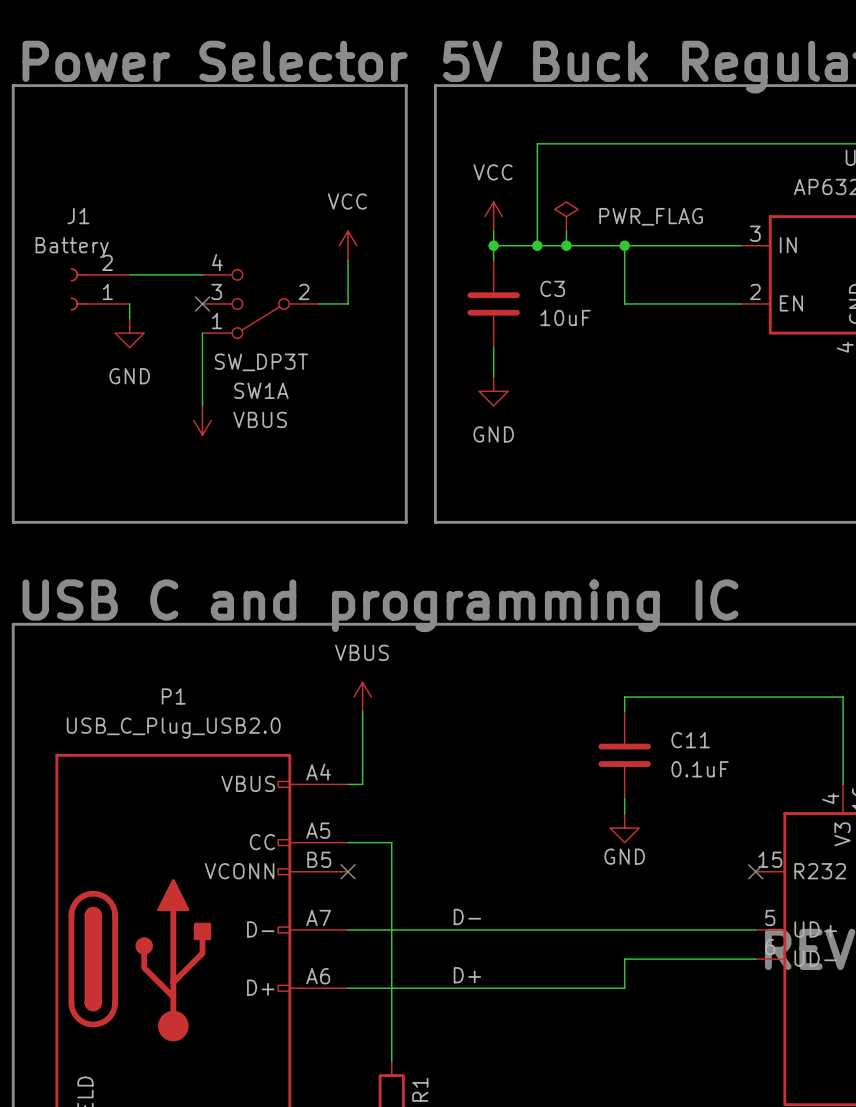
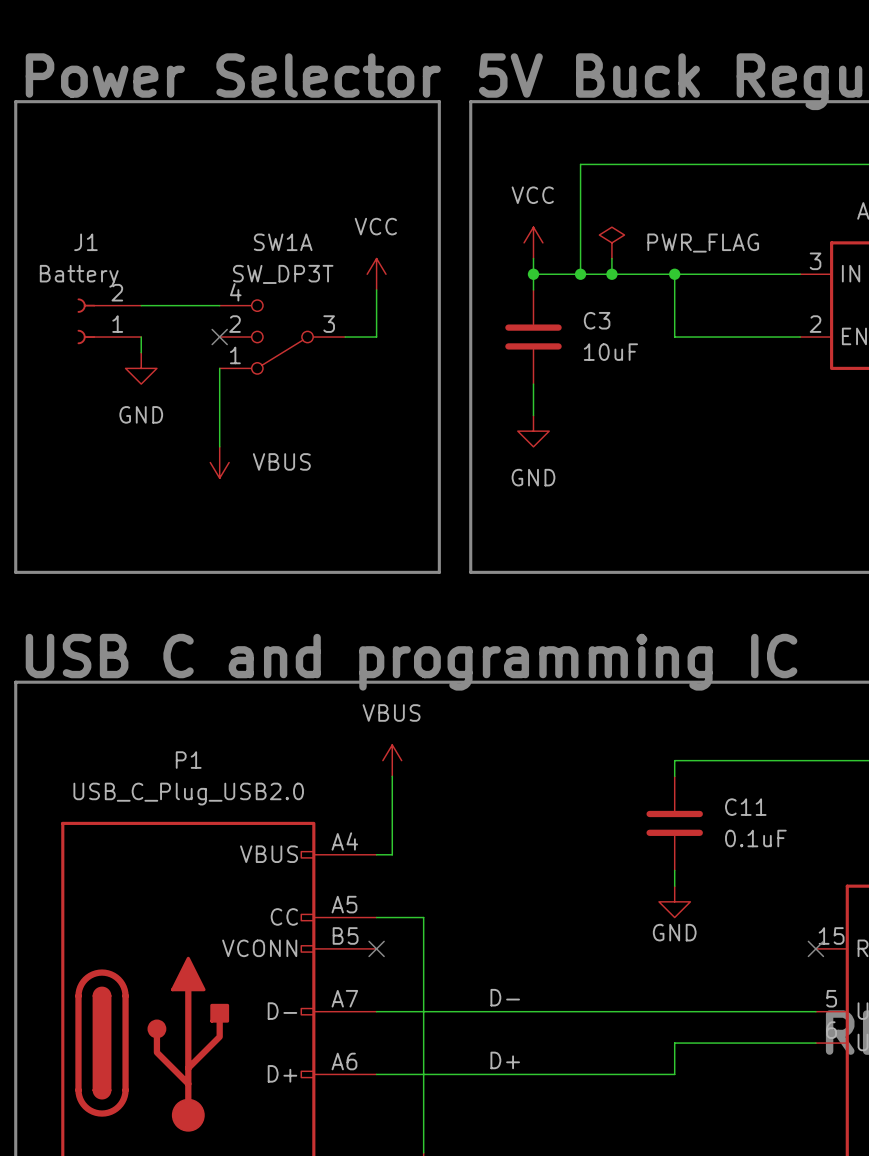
SW1A pin number: 3 (216, 291) -> 2 (235, 324)
SW1A pin number: 2 (304, 291) -> 3 (329, 324)
SW1A value position: SW_DP3T (261, 362) -> SW_DP3T (283, 274)
SW1A name position: SW1A (261, 390) -> SW1A (283, 242)

